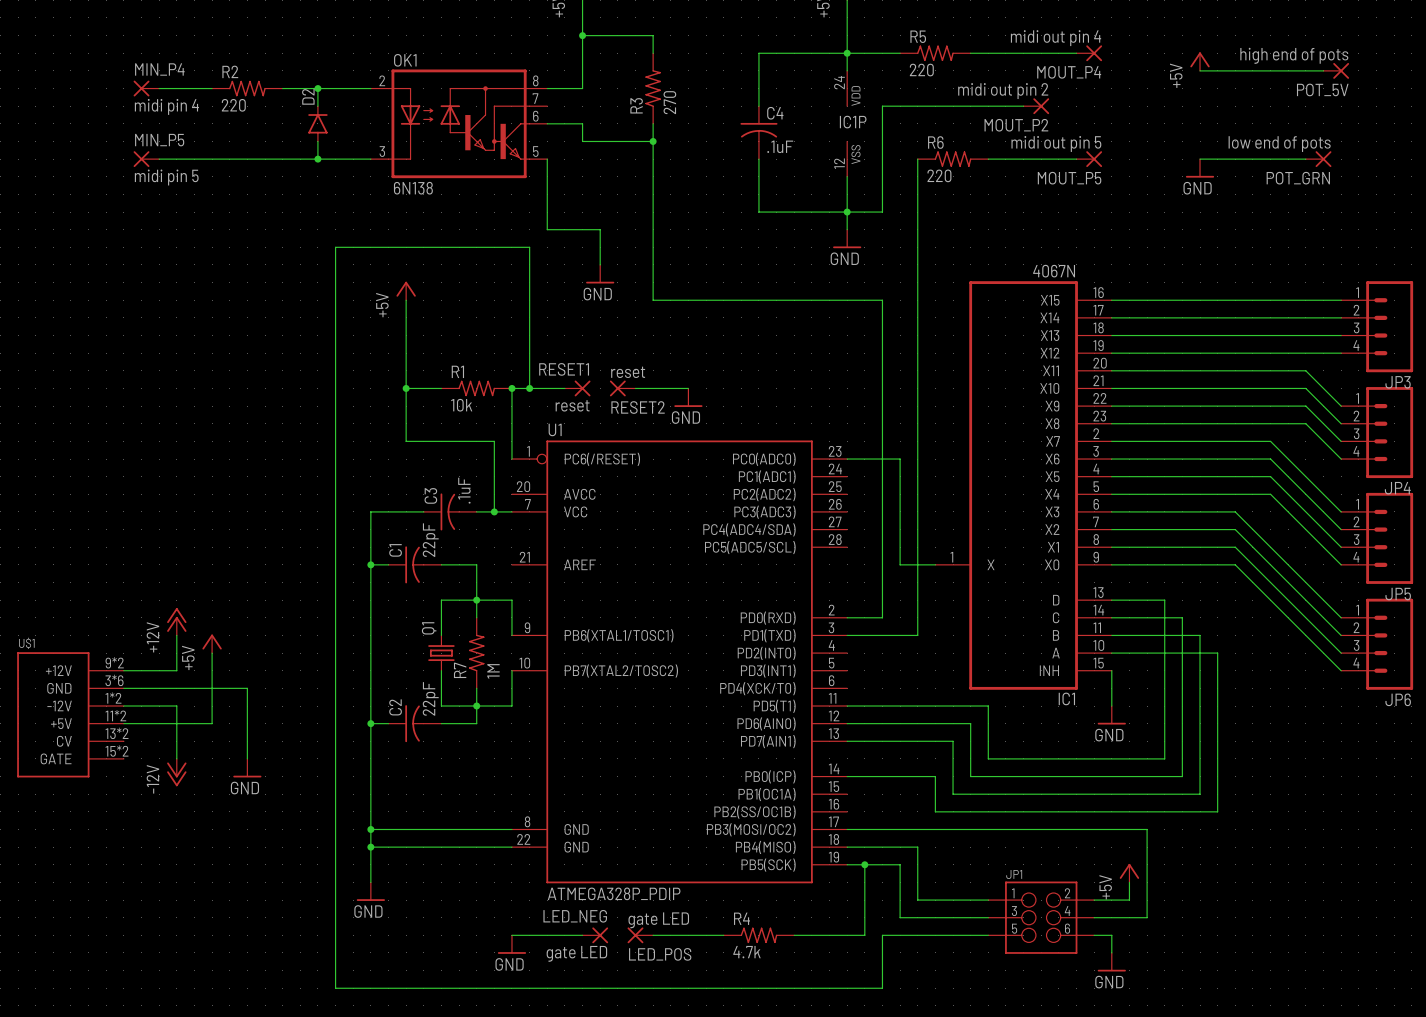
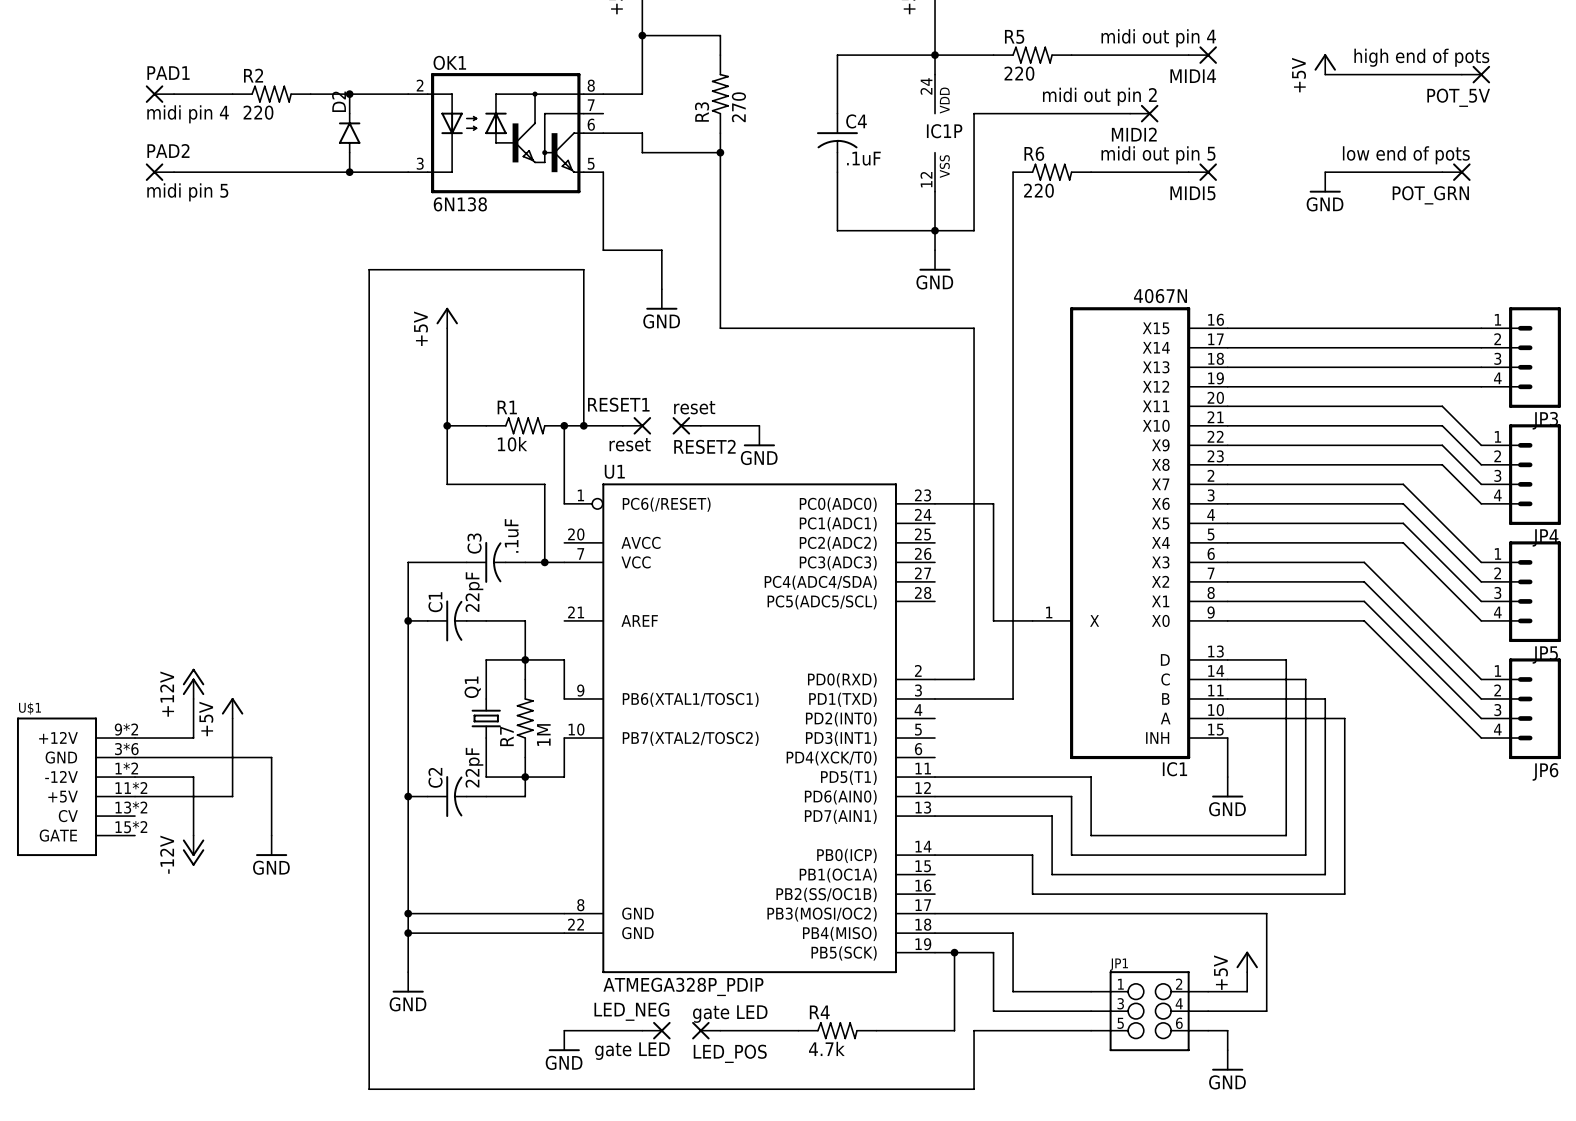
MIN_P4 name: MIN_P4 (159, 69) -> PAD1 (168, 73)
MOUT_P4 name: MOUT_P4 (1069, 72) -> MIDI4 (1193, 76)
MOUT_P2 name: MOUT_P2 (1016, 125) -> MIDI2 (1134, 134)
MIN_P5 name: MIN_P5 (159, 140) -> PAD2 (168, 150)
MOUT_P5 name: MOUT_P5 (1069, 178) -> MIDI5 (1192, 193)

